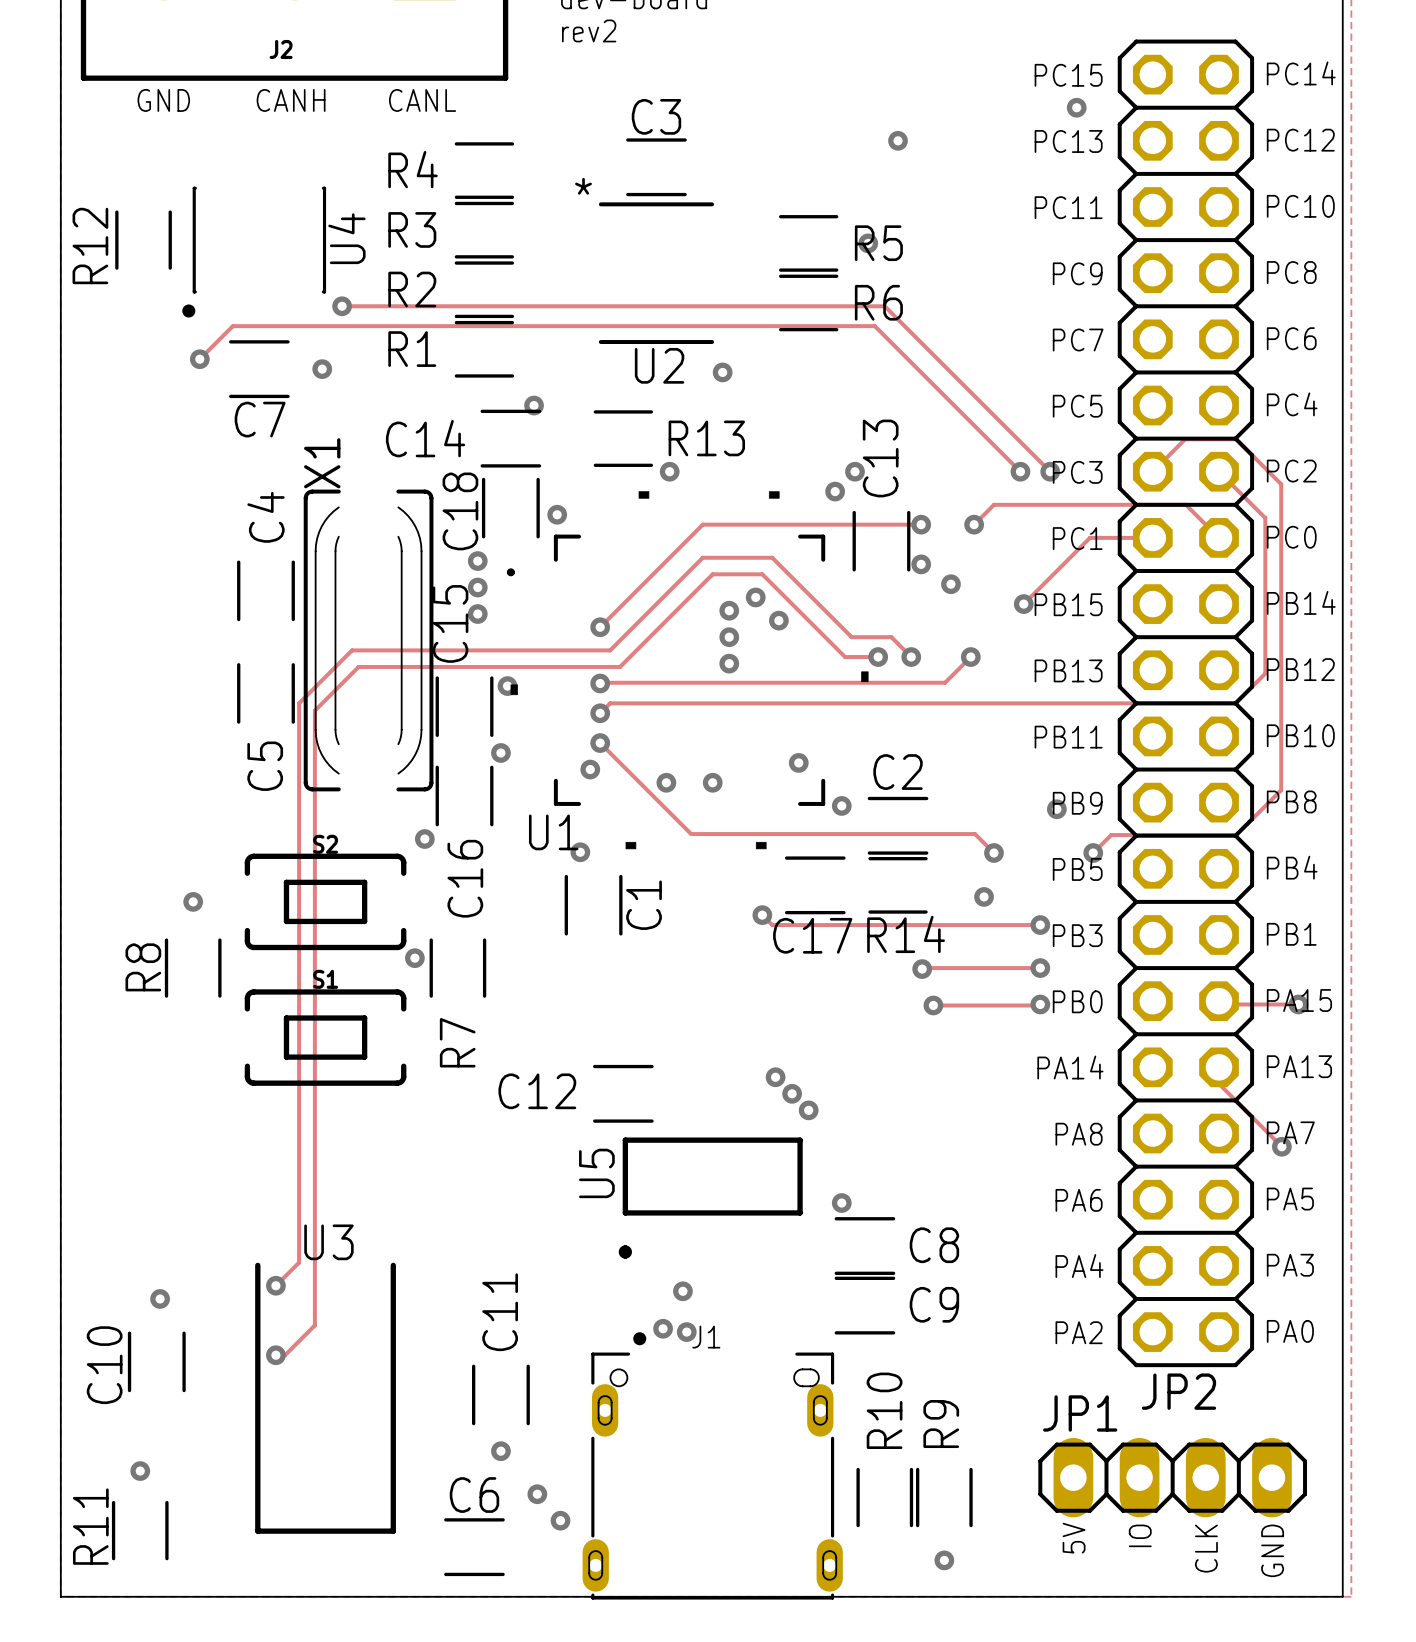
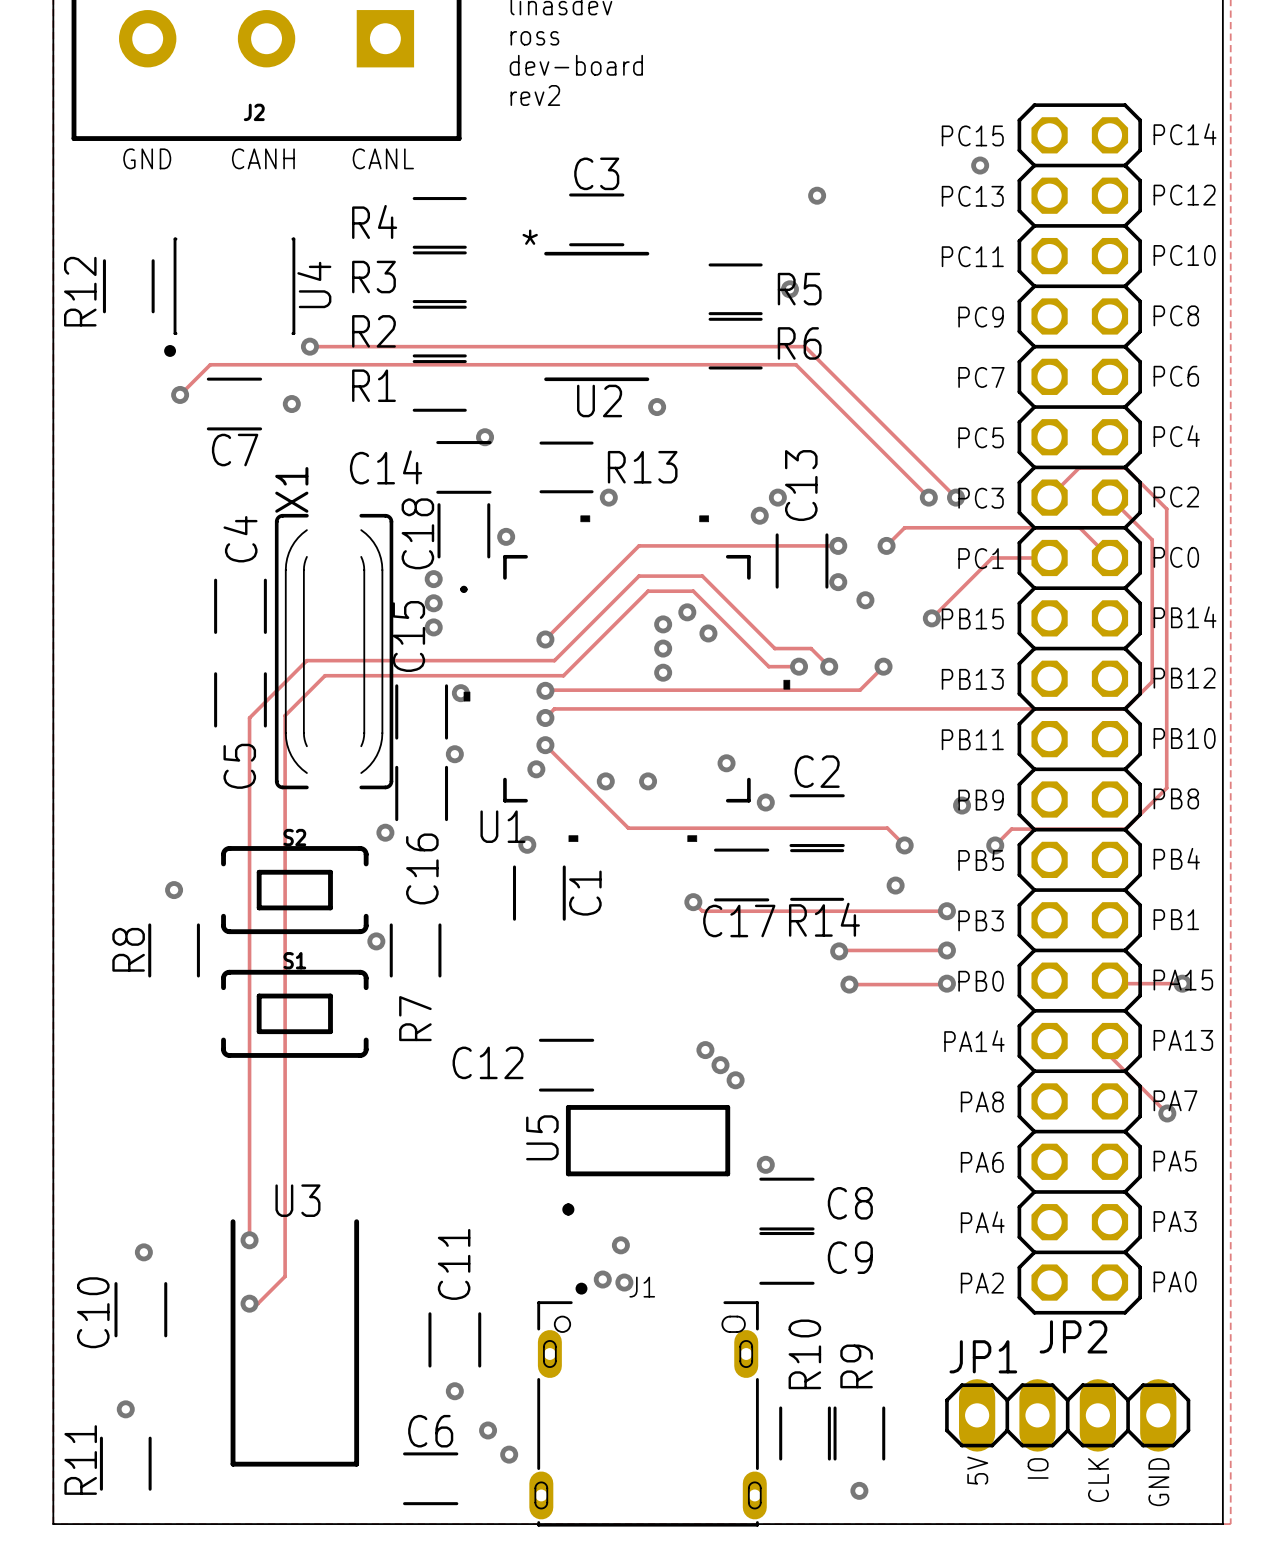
track: (352, 650) (299, 703) (299, 1262) (275, 1285) -> (318, 660) (306, 660) (249, 717) (249, 1240)

